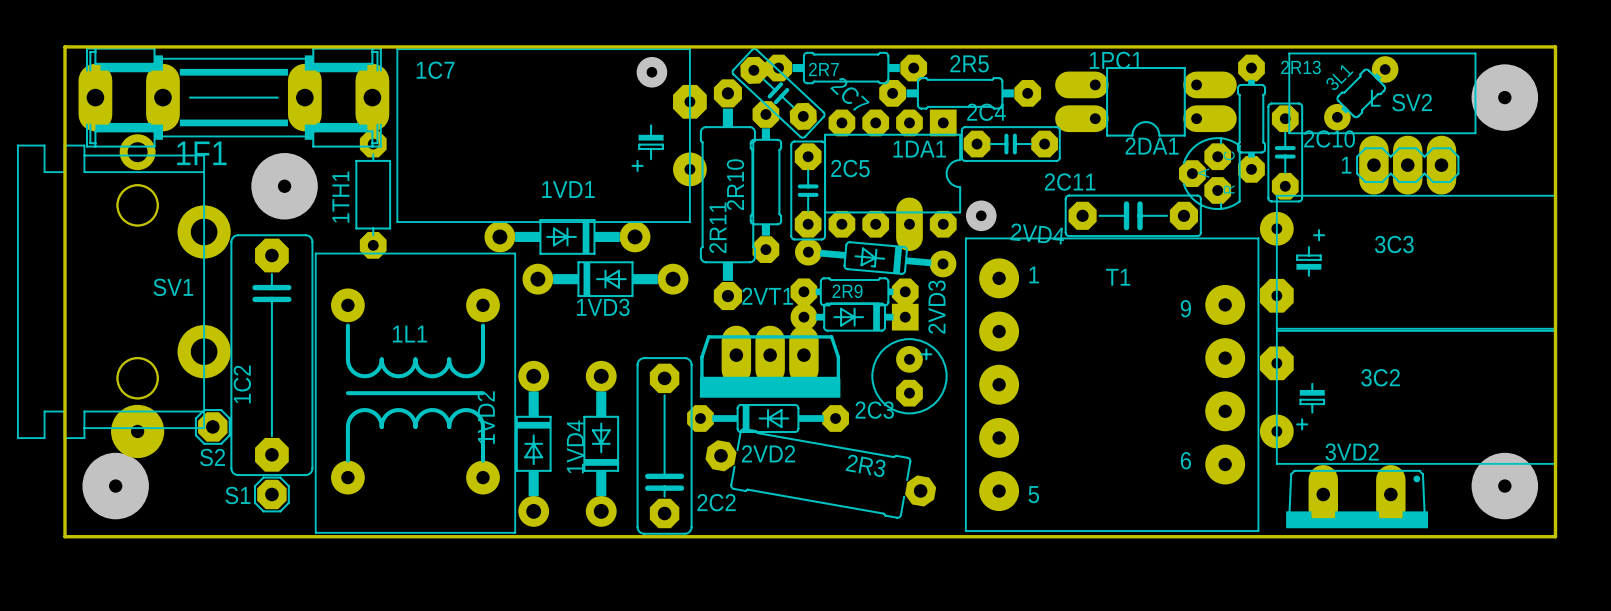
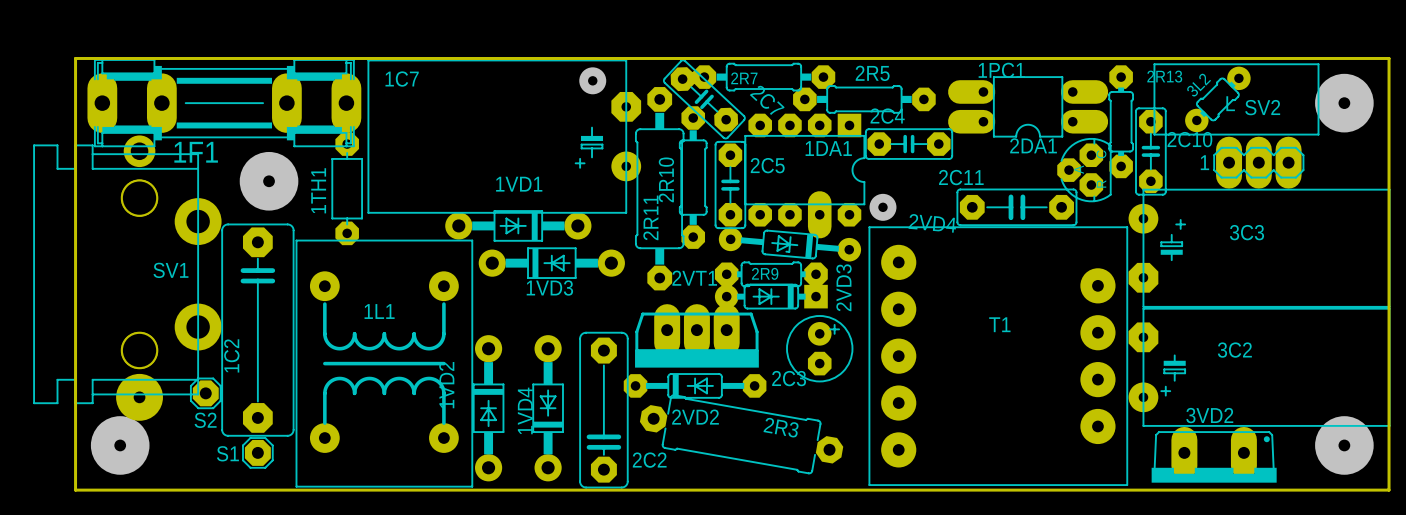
3L1 name: 3L1 (1339, 77) -> 3L2 (1199, 85)
T1 text: 1 (1034, 274) -> none
T1 name position: T1 (1118, 277) -> T1 (999, 324)
T1 text: 9 (1185, 308) -> none
T1 text: 6 (1185, 460) -> none
T1 text: 5 (1033, 494) -> none

